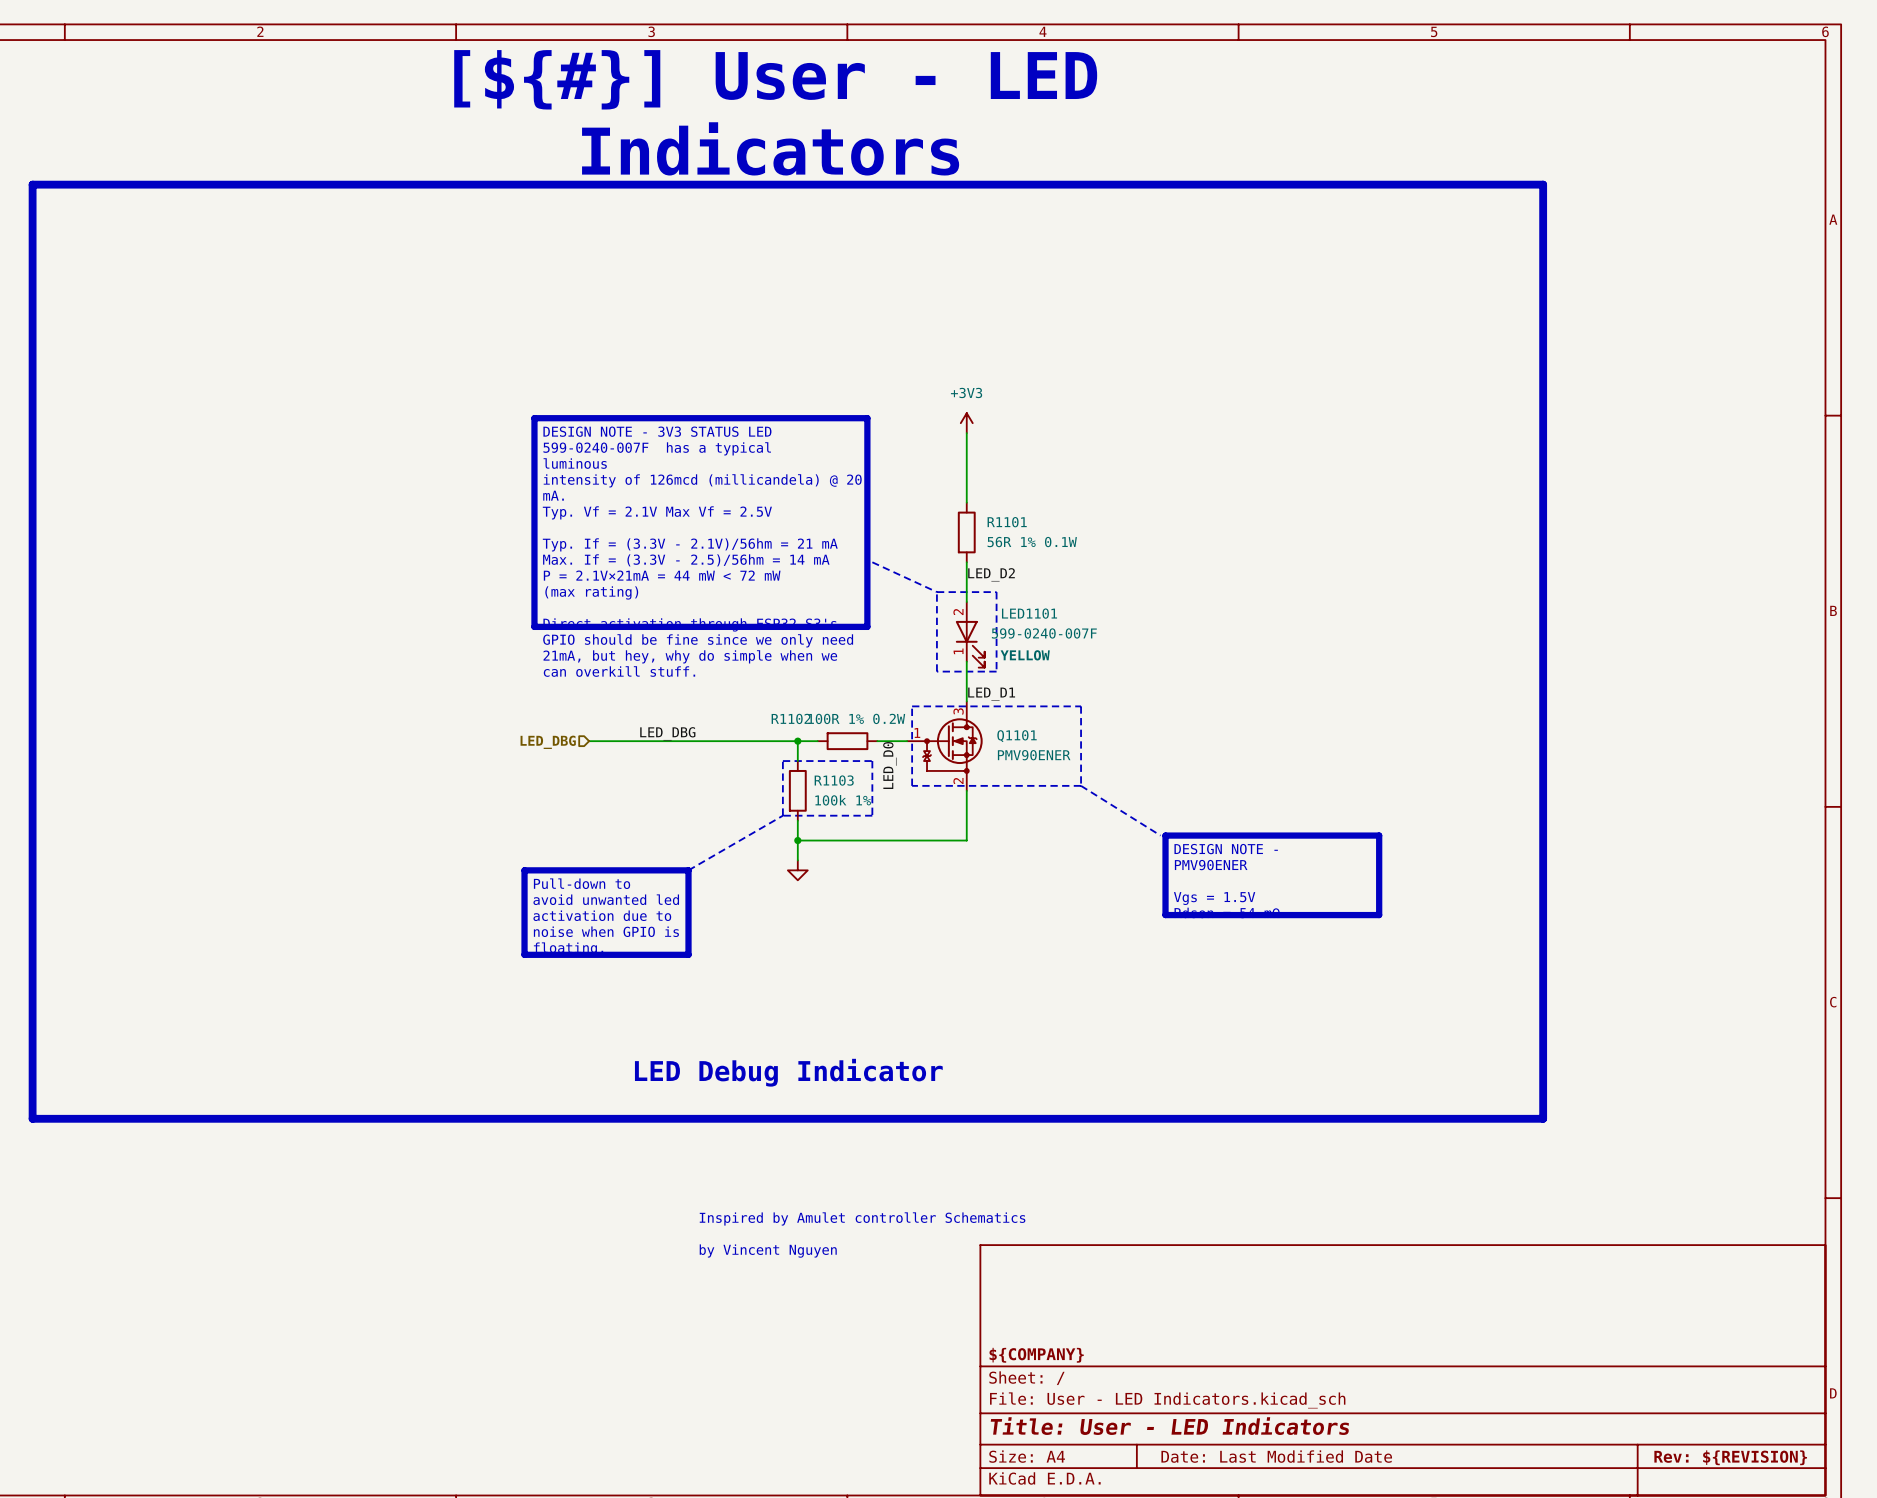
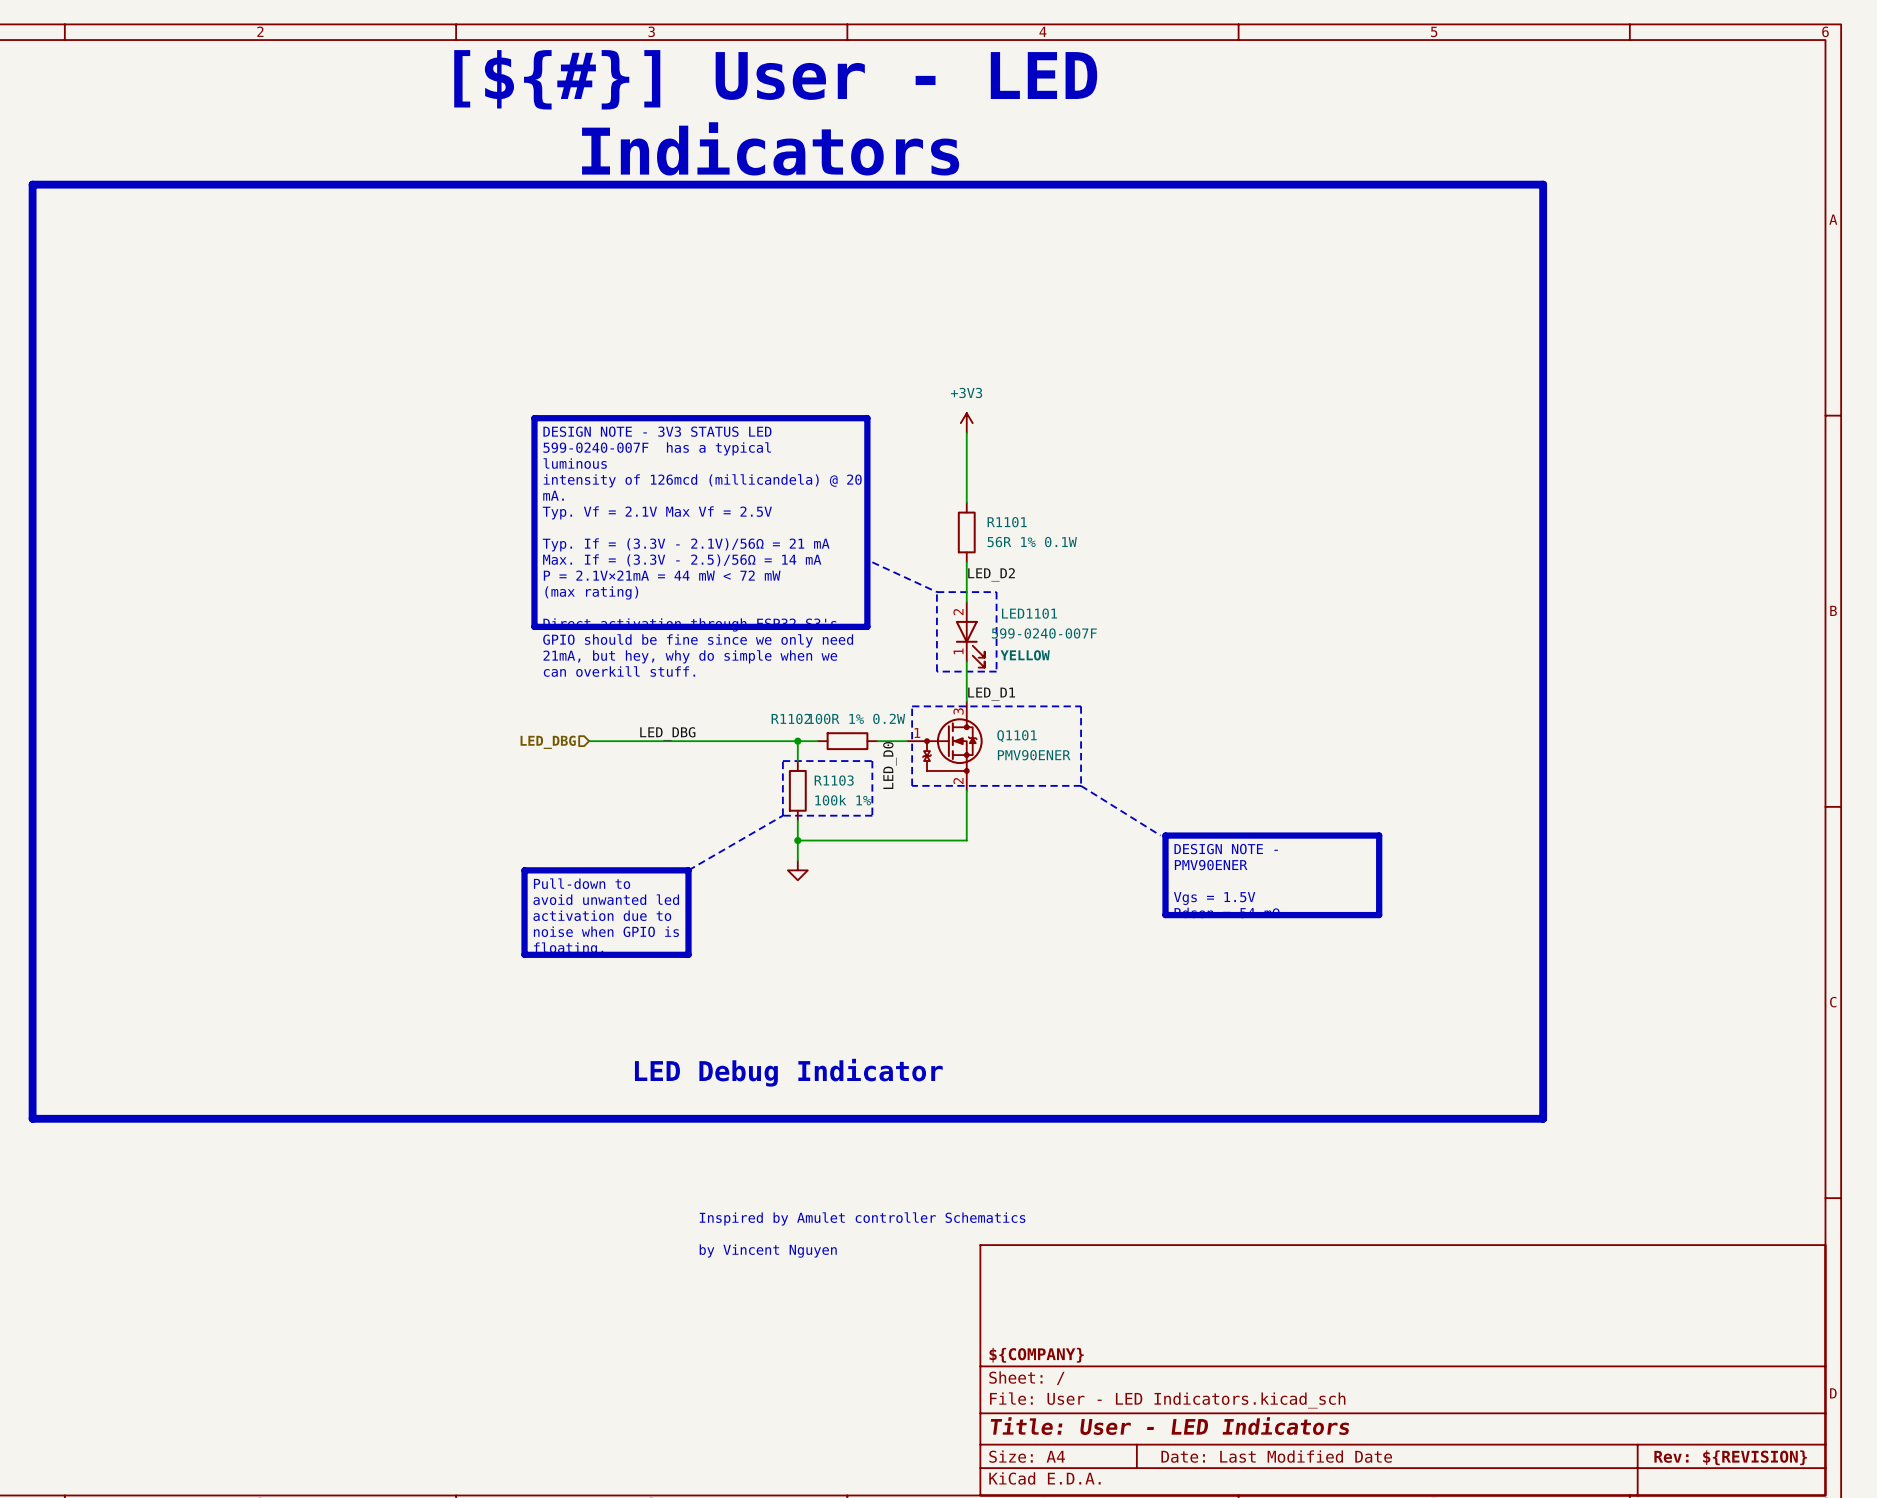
text: Typ. If = (3.3V - 2.1V)/56hm = 21 mA (690, 544) -> Typ. If = (3.3V - 2.1V)/56Ω = 21 mA (686, 544)
text: Max. If = (3.3V - 2.5)/56hm = 14 mA (686, 560) -> Max. If = (3.3V - 2.5)/56Ω = 14 mA (682, 560)

